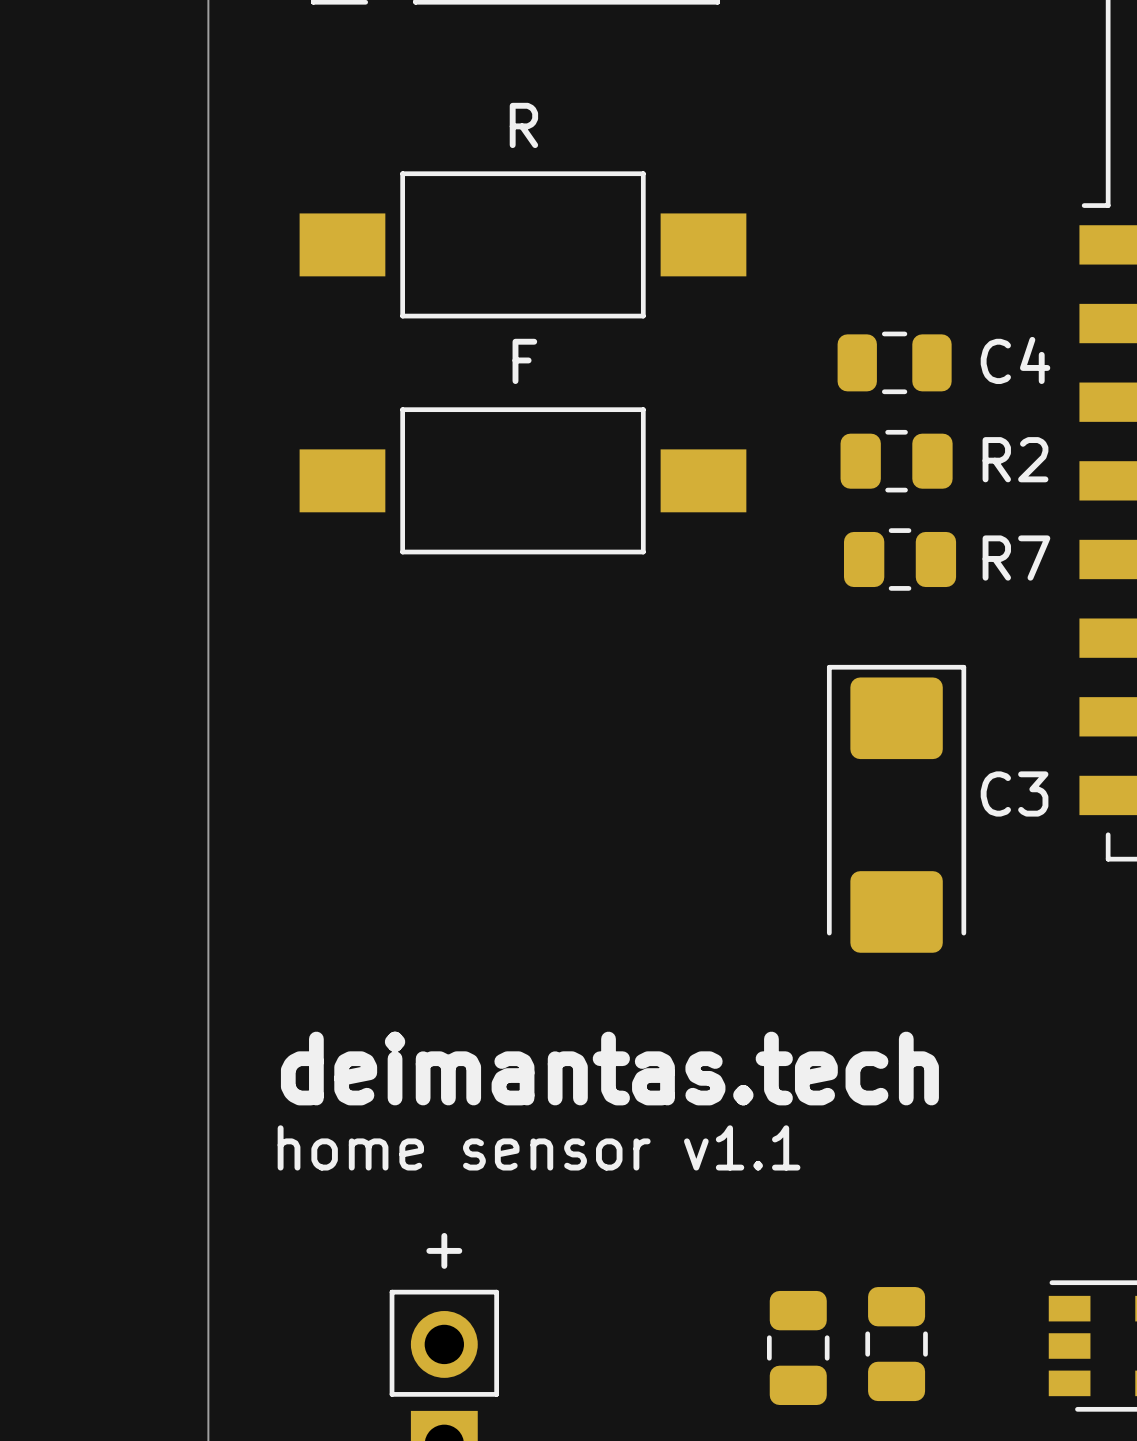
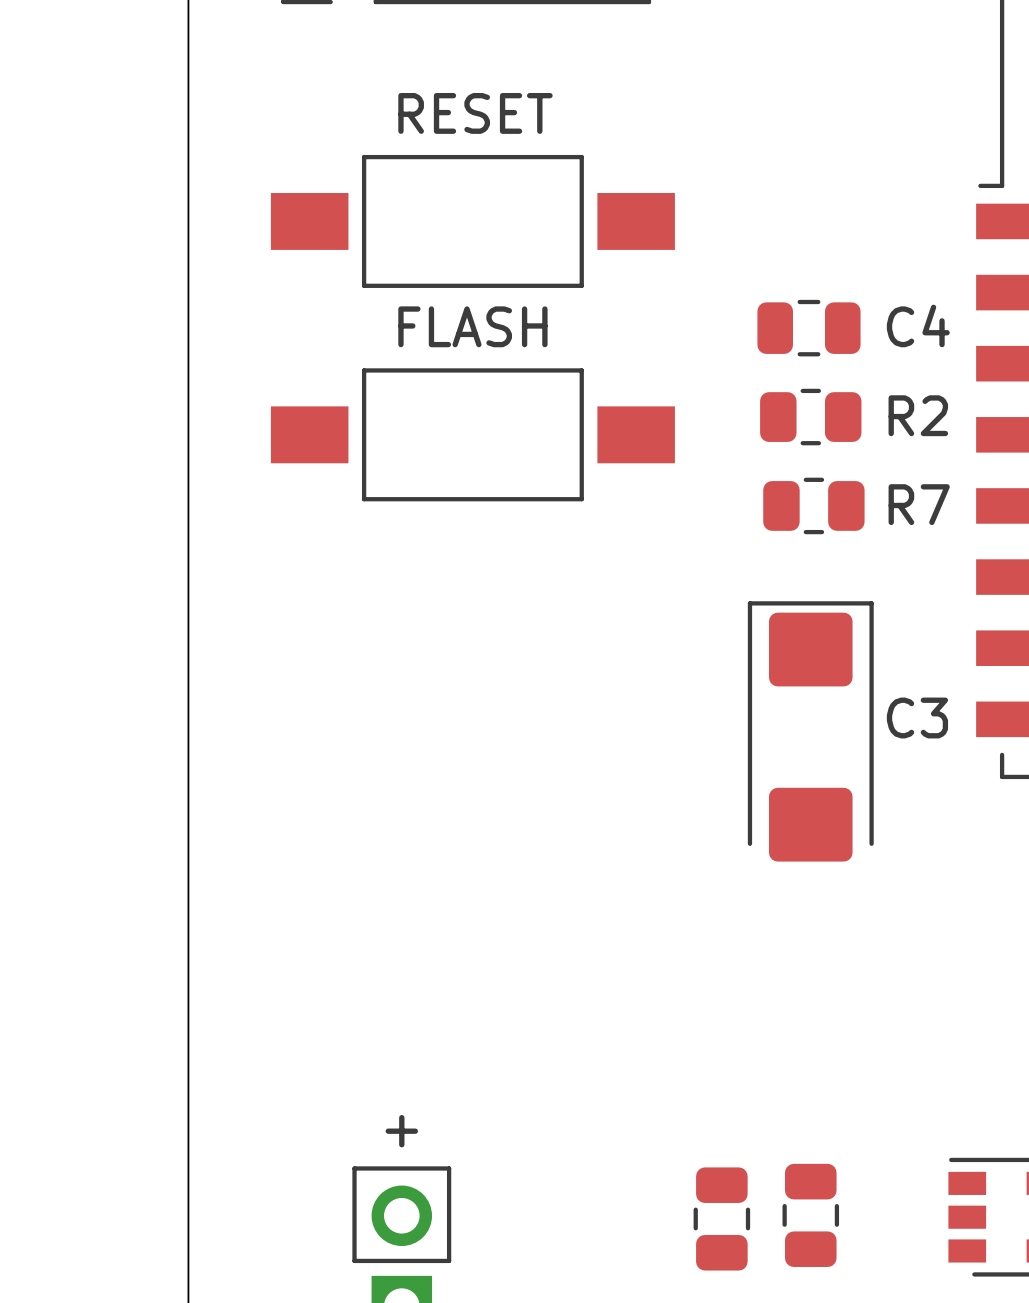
text: R (523, 125) -> RESET (475, 113)
text: F (524, 361) -> FLASH (472, 326)
text: deimantas.tech (609, 1068) -> none
text: home sensor v1.1 (539, 1147) -> none

